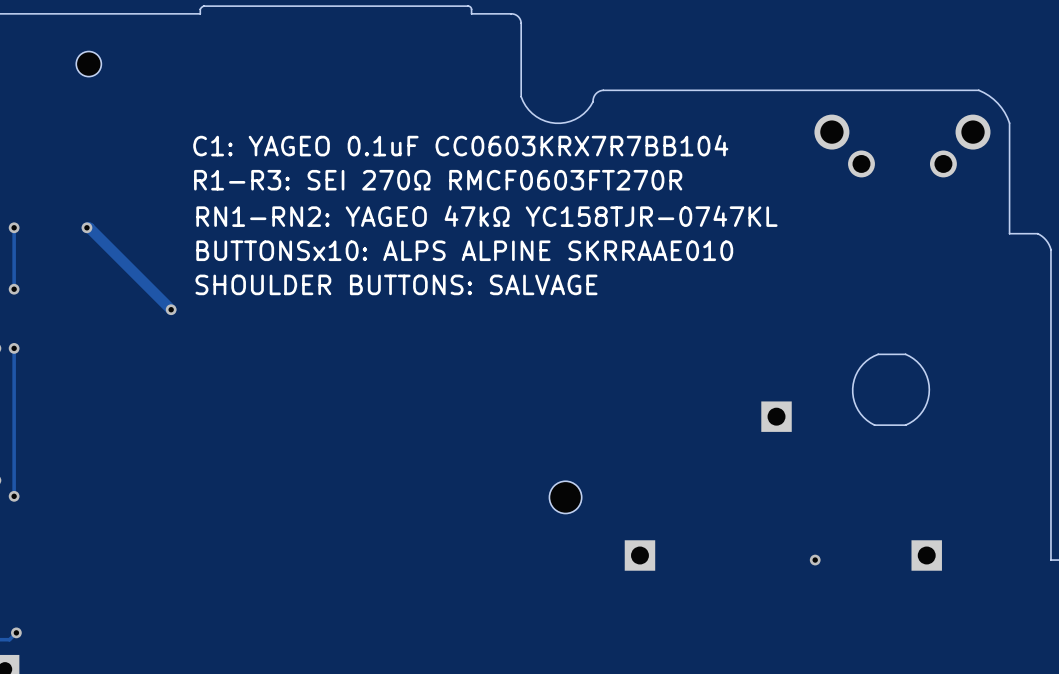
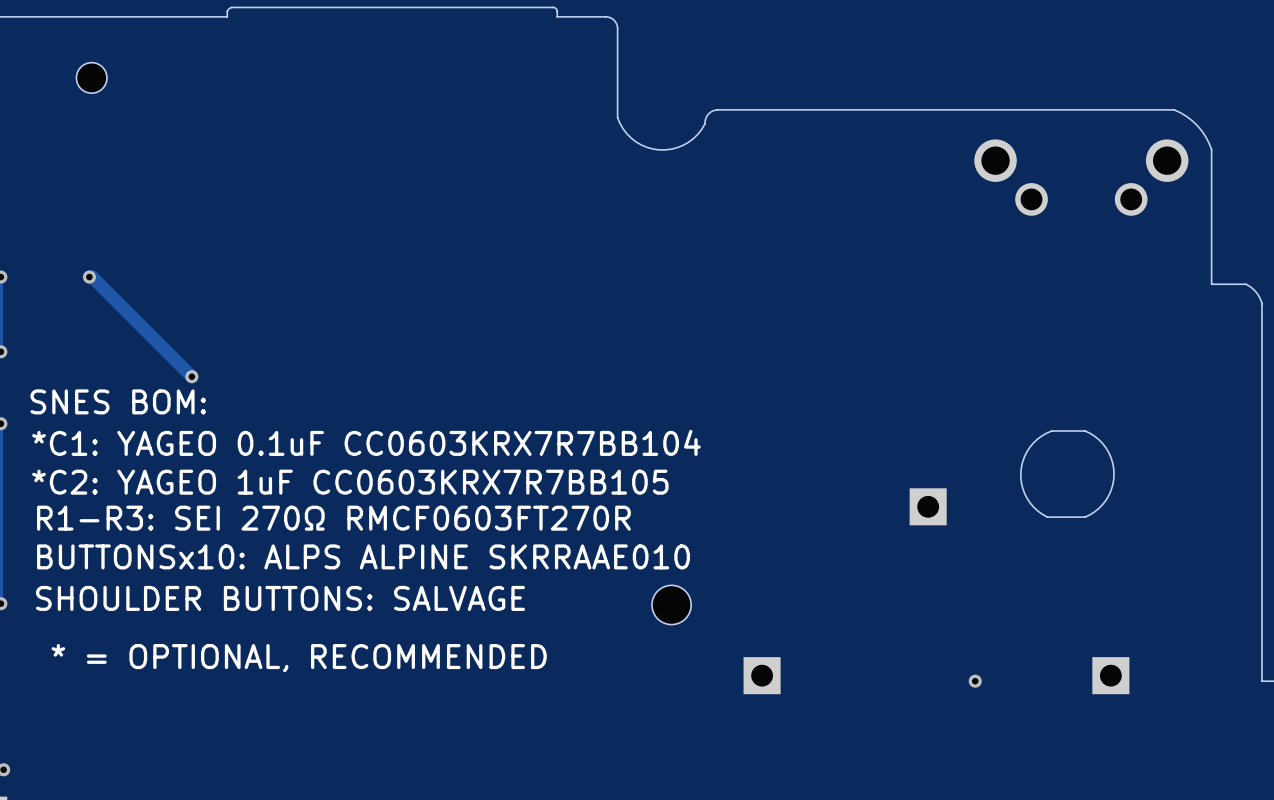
text: C1: YAGEO 0.1uF CC0603KRX7R7BB104 (460, 145) -> none
text position: R1-R3: SEI 270Ω RMCF0603FT270R (438, 180) -> R1-R3: SEI 270Ω RMCF0603FT270R (333, 518)
text: RN1-RN2: YAGEO 47kΩ YC158TJR-0747KL (486, 216) -> none
text position: BUTTONSx10: ALPS ALPINE SKRRAAE010 (464, 250) -> BUTTONSx10: ALPS ALPINE SKRRAAE010 (363, 556)
text position: SHOULDER BUTTONS: SALVAGE (396, 284) -> SHOULDER BUTTONS: SALVAGE (280, 598)
text: none -> SNES BOM: (118, 401)
text: none -> *C1: YAGEO 0.1uF CC0603KRX7R7BB104 (366, 442)
text: none -> *C2: YAGEO 1uF CC0603KRX7R7BB105 (350, 482)
text: none -> * = OPTIONAL, RECOMMENDED (299, 658)

